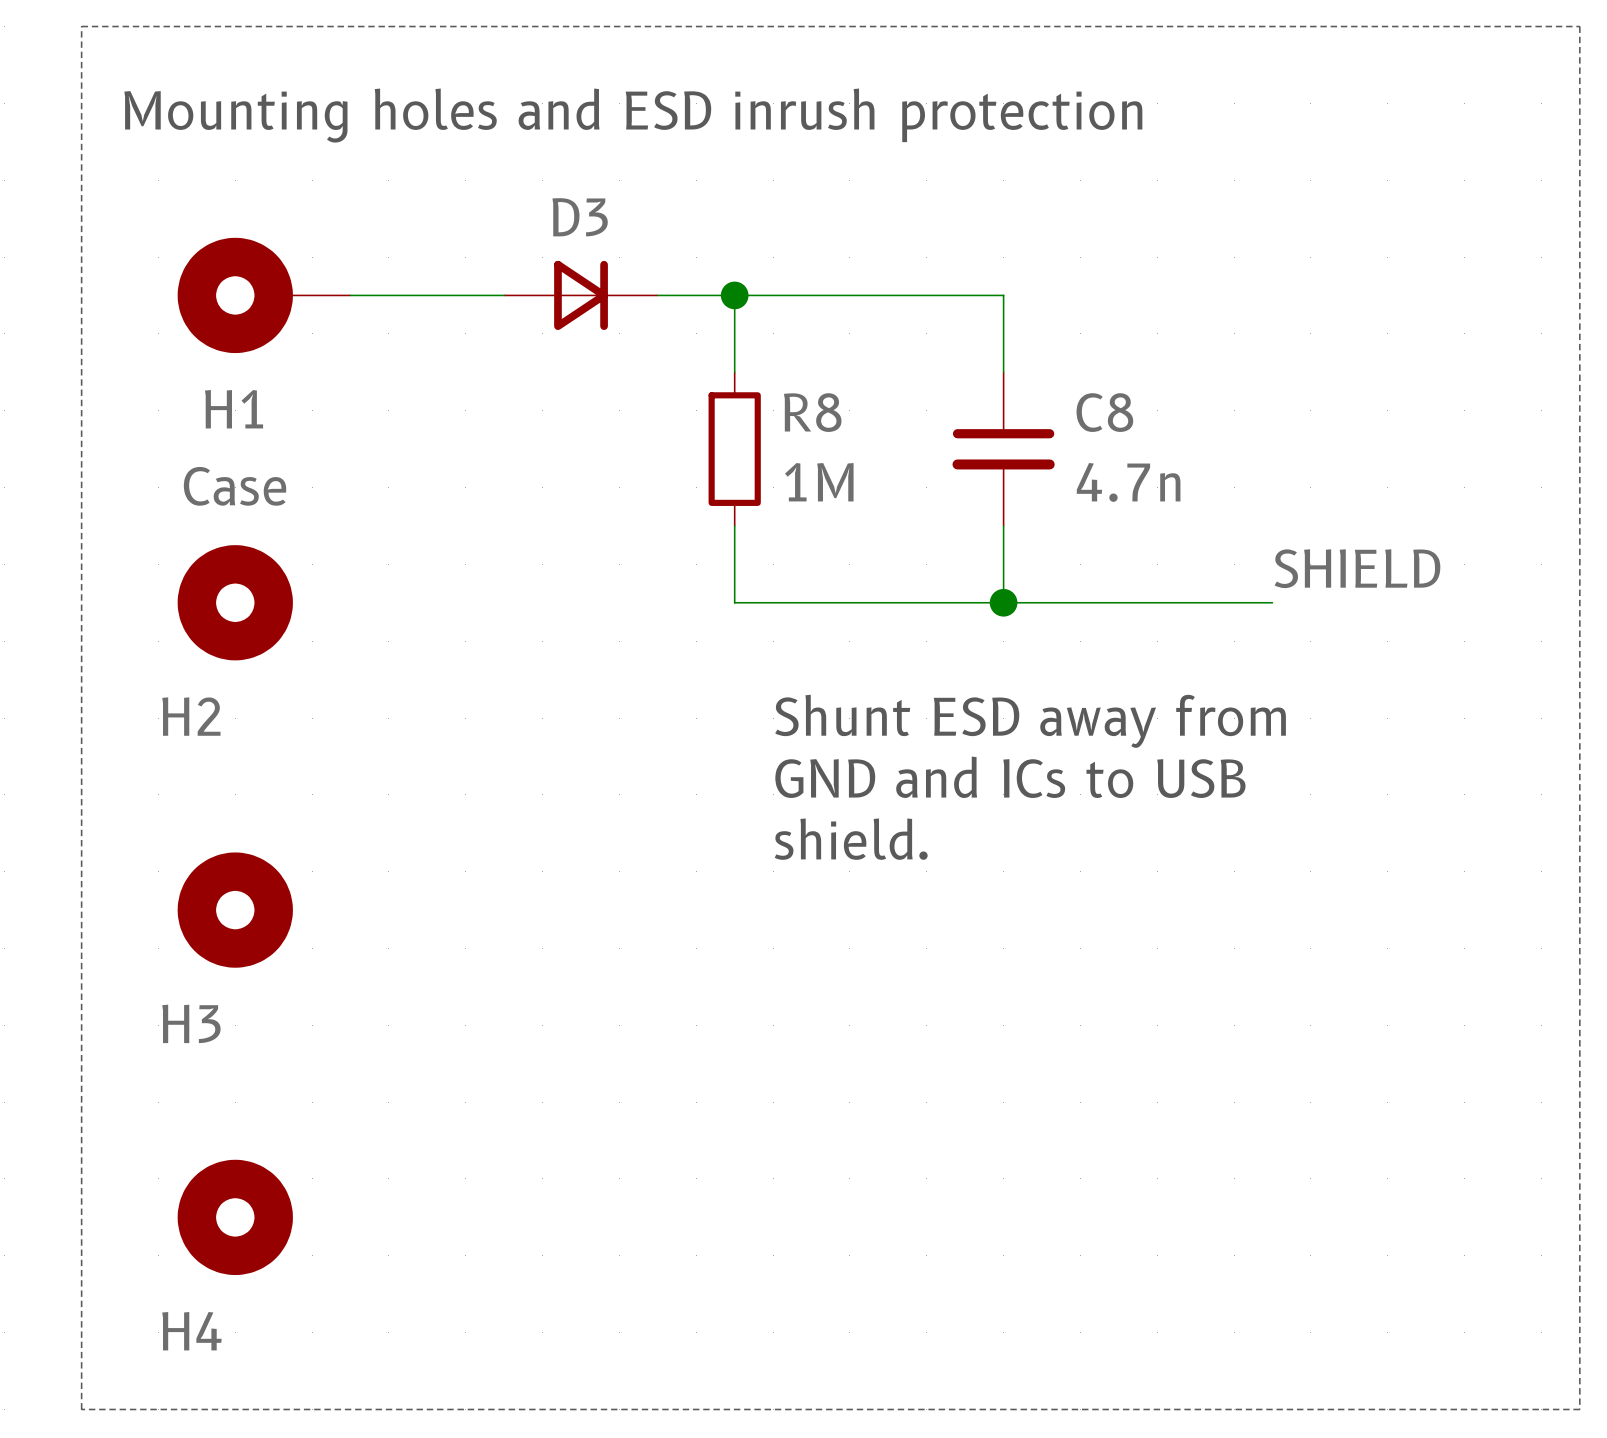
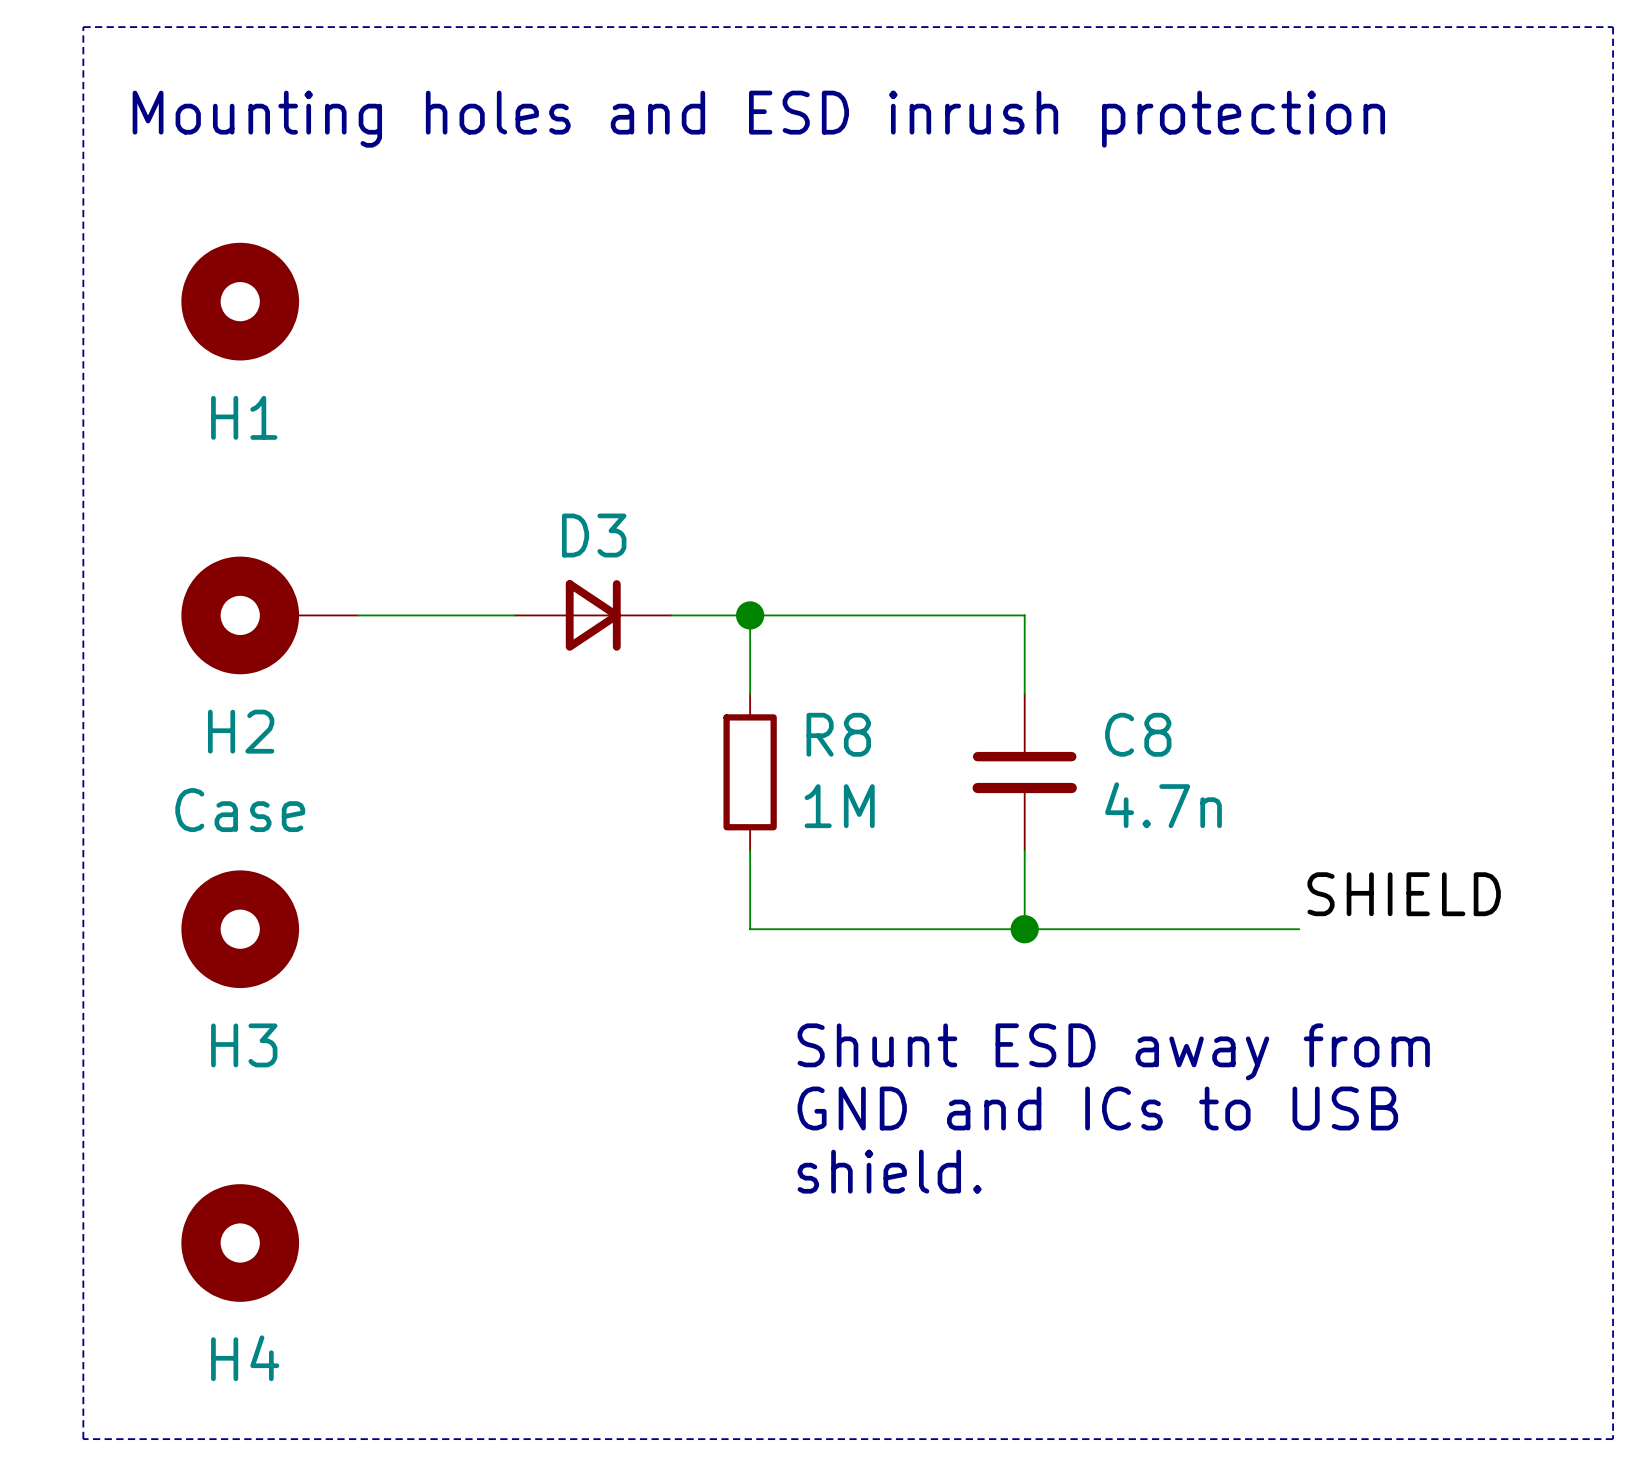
H1 symbol: [177, 237, 351, 354] -> [181, 242, 300, 361]
wire: (350, 295) (504, 295) -> (357, 615) (514, 615)
D3 position: (581, 295) -> (593, 615)
wire: (657, 295) (1003, 295) (1003, 372) -> none
wire: (734, 295) (734, 372) -> (1024, 615) (1024, 693)
junction: (734, 295) -> none
R8 position: (734, 449) -> (750, 772)
C8 position: (1003, 449) -> (1024, 772)
H1 value: Case (235, 486) -> none
wire: (734, 525) (734, 602) -> (1024, 850) (1024, 929)
wire: (1003, 525) (1003, 602) (1272, 602) -> none
H2 symbol: [177, 545, 293, 661] -> [181, 556, 358, 675]
label position: SHIELD (1357, 568) -> SHIELD (1404, 894)
wire: none -> (671, 615) (750, 615) (750, 693)
junction: none -> (750, 615)
junction: (1003, 602) -> none
text position: Shunt ESD away from (1030, 721) -> Shunt ESD away from (1113, 1051)
text position: GND and ICs to USB (1010, 777) -> GND and ICs to USB (1097, 1108)
H2 value: none -> Case (240, 810)
wire: none -> (750, 850) (750, 929) (1299, 929)
text position: shield. (851, 839) -> shield. (889, 1171)
junction: none -> (1024, 929)
H3 name position: H3 (191, 1023) -> H3 (244, 1045)
H4 name position: H4 (191, 1331) -> H4 (245, 1358)

